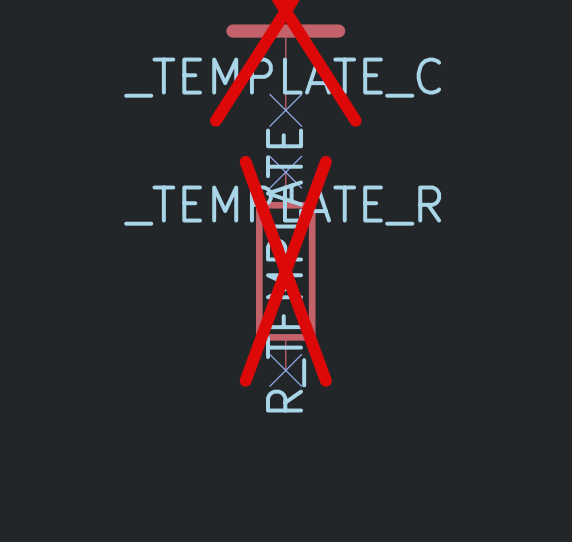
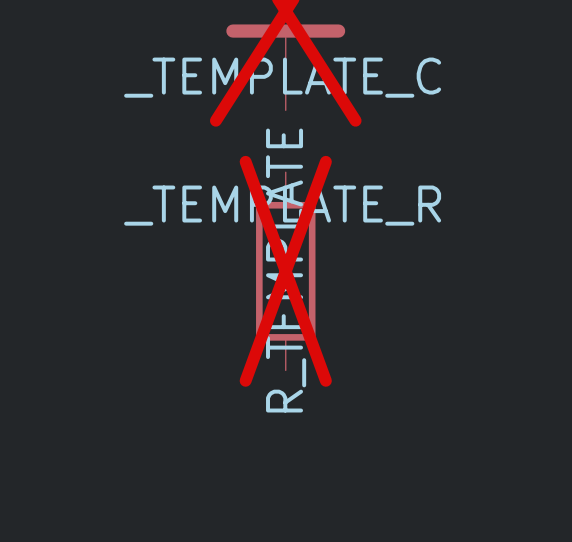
no-connect mark: (285, 110) -> none
no-connect mark: (285, 172) -> none
no-connect mark: (285, 370) -> none

